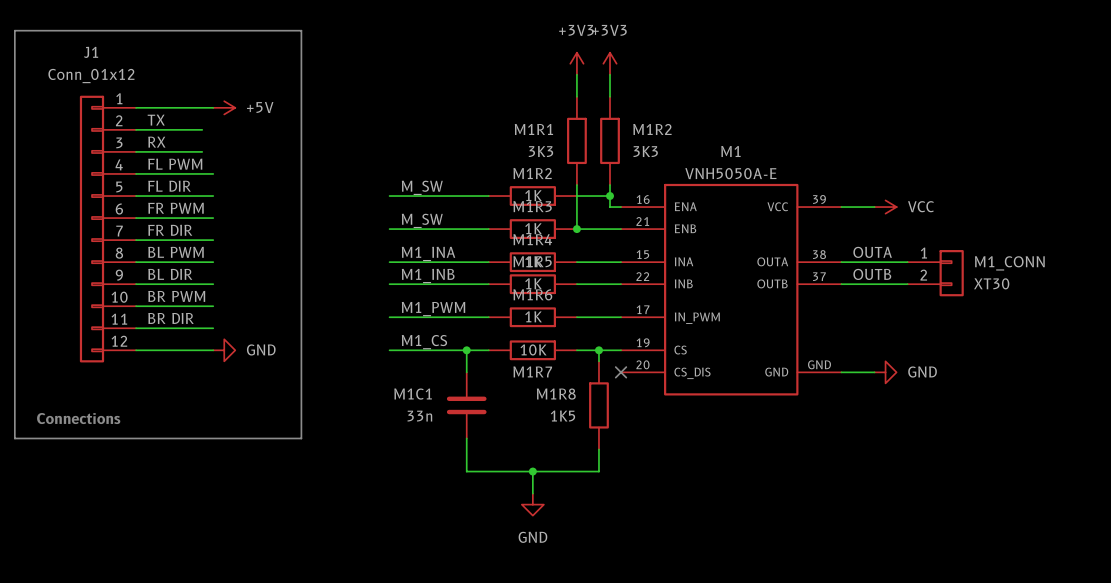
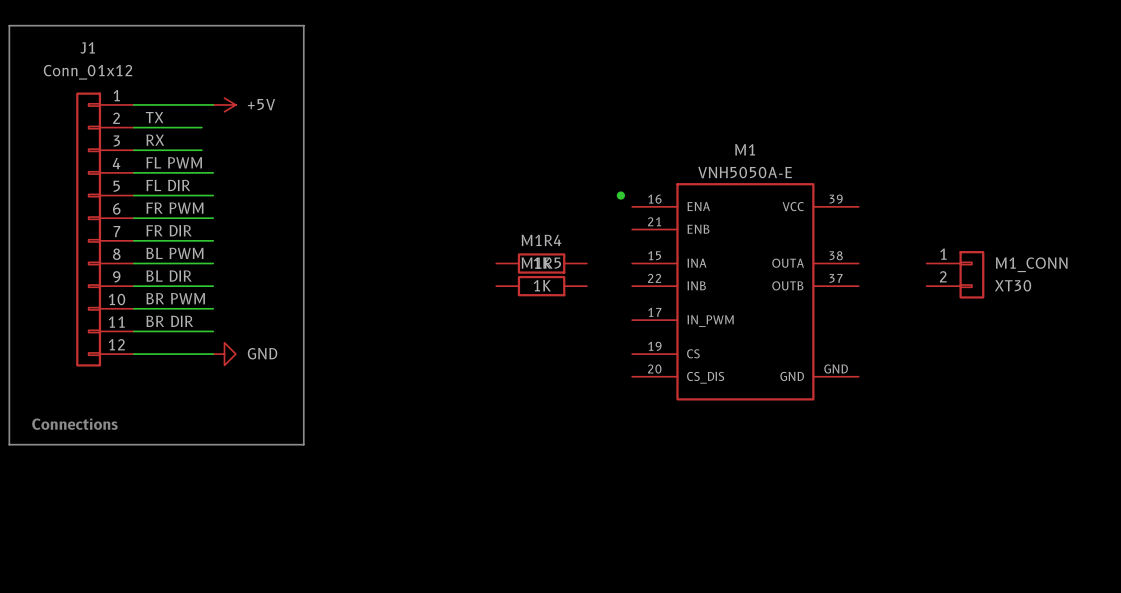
power symbol: +3V3 (576, 63) -> none
power symbol: +3V3 (610, 63) -> none
wire: (576, 74) (576, 96) -> none
wire: (610, 74) (610, 96) -> none
M1R1: 3K3 (576, 140) -> none
M1R2: 3K3 (610, 140) -> none
wire: (576, 184) (576, 229) (621, 229) -> none
wire: (610, 184) (610, 207) (621, 207) -> none
label: M_SW (422, 187) -> none
wire: (389, 196) (488, 196) -> none
M1R2: 1K (532, 196) -> none
wire: (576, 196) (610, 196) -> none
wire: (841, 207) (874, 207) -> none
power symbol: VCC (885, 207) -> none
label: M_SW (422, 220) -> none
wire: (389, 229) (488, 229) -> none
M1R3: 1K (532, 229) -> none
junction: (576, 229) -> none
label: OUTA (872, 252) -> none
label: M1_INA (428, 253) -> none
wire: (389, 262) (488, 262) -> none
wire: (576, 262) (621, 262) -> none
wire: (841, 262) (907, 262) -> none
label: OUTB (872, 274) -> none
label: M1_INB (428, 276) -> none
wire: (389, 284) (488, 284) -> none
wire: (576, 284) (621, 284) -> none
wire: (841, 284) (907, 284) -> none
label: M1_PWM (433, 309) -> none
wire: (389, 317) (488, 317) -> none
M1R6: 1K (532, 317) -> none
wire: (576, 317) (621, 317) -> none
label: M1_CS (424, 342) -> none
wire: (389, 350) (488, 350) -> none
wire: (466, 350) (466, 372) -> none
junction: (466, 350) -> none
M1R7: 10K (532, 350) -> none
wire: (576, 350) (621, 350) -> none
wire: (598, 350) (598, 361) -> none
junction: (598, 350) -> none
no-connect mark: (621, 372) -> none
wire: (841, 372) (874, 372) -> none
power symbol: GND (885, 372) -> none
M1C1: 33n (466, 405) -> none
M1R8: 1K5 (598, 405) -> none
wire: (466, 438) (466, 471) (598, 471) (598, 449) -> none
wire: (532, 471) (532, 493) -> none
junction: (532, 471) -> none
power symbol: GND (532, 504) -> none

